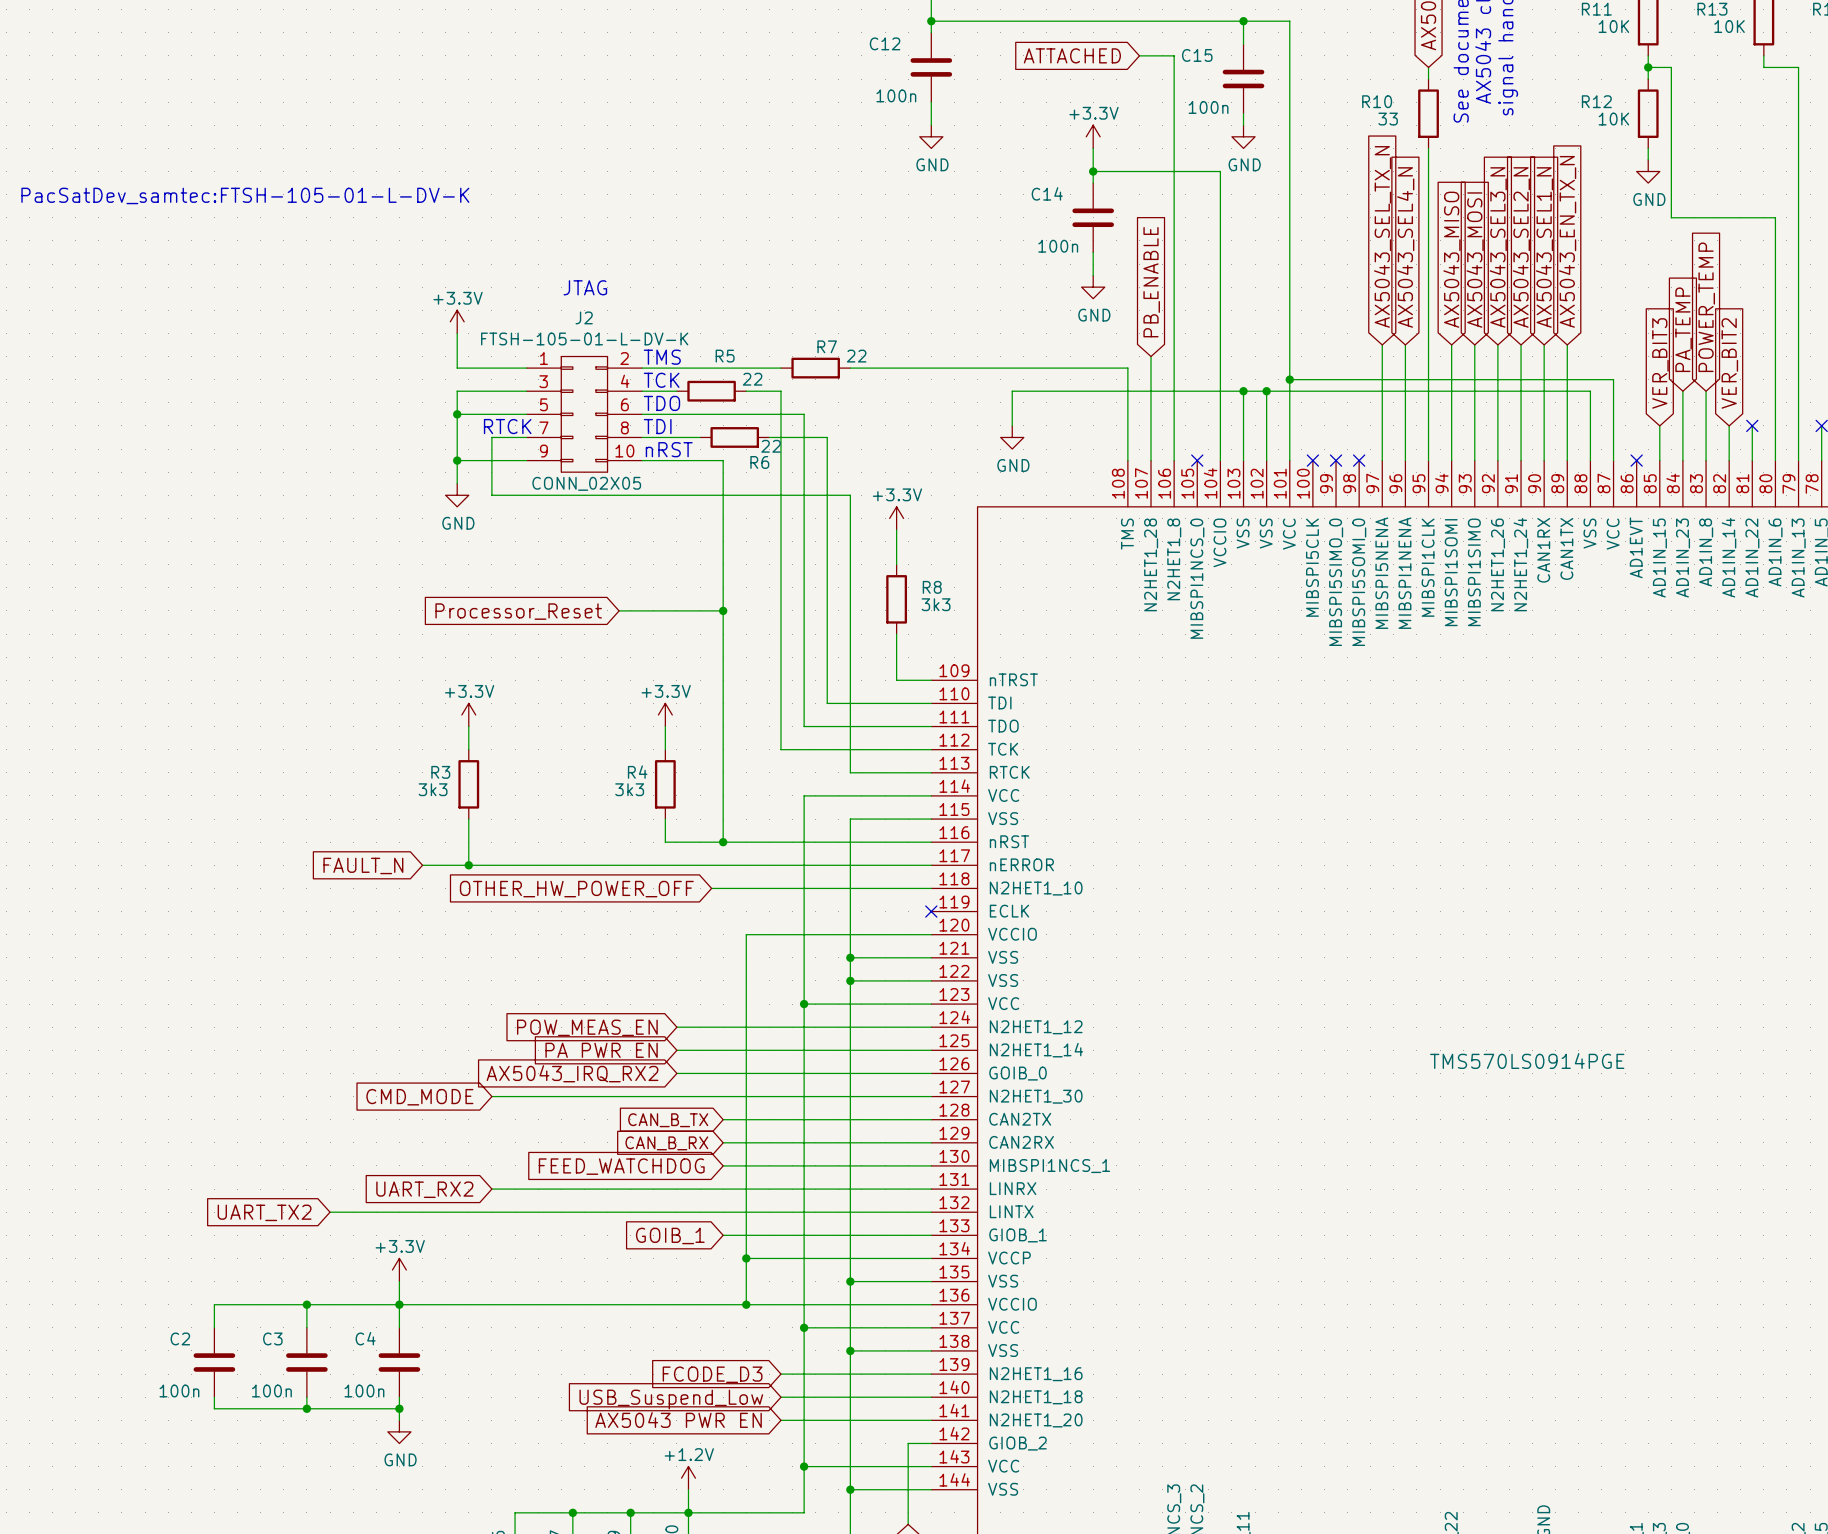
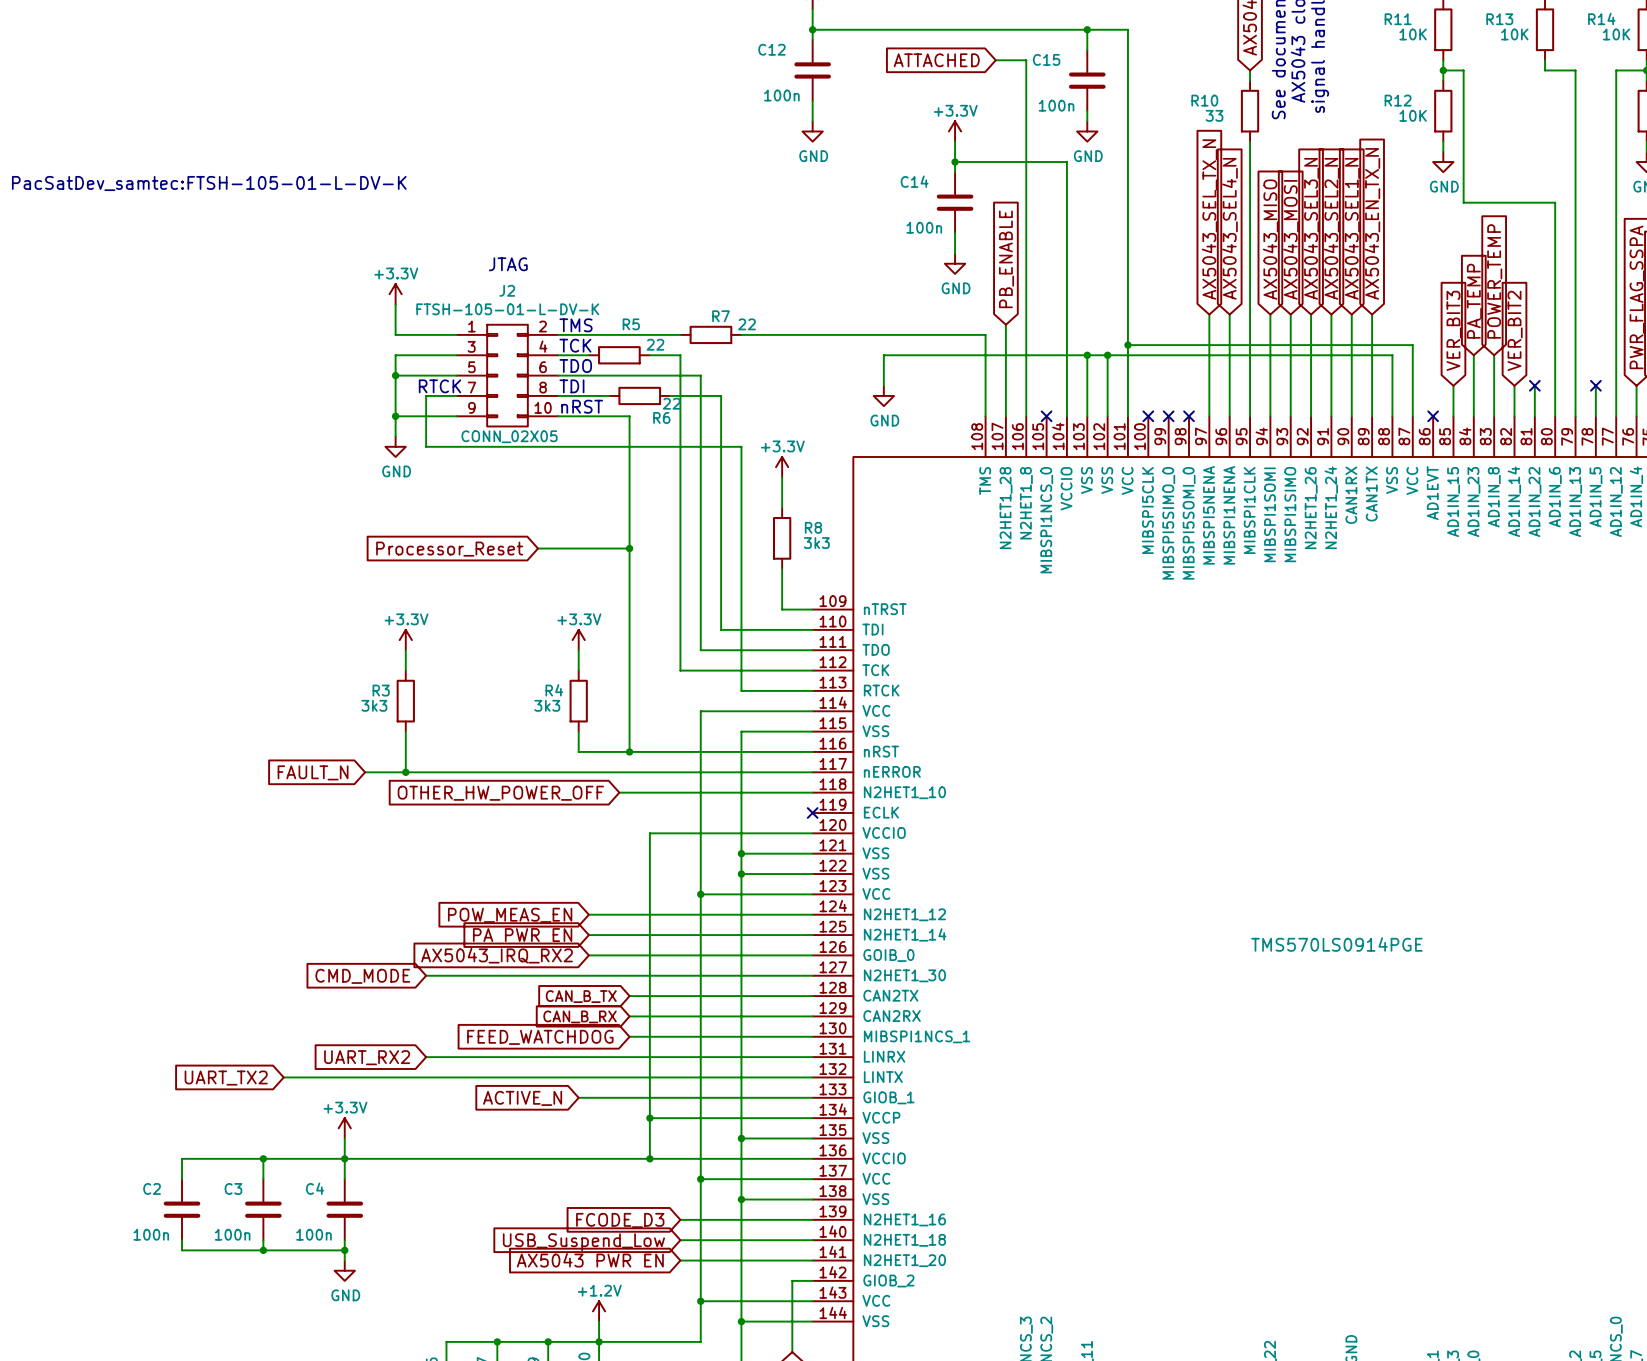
global label: none -> ACTIVE_N (522, 1098)
wire: none -> (578, 1097) (629, 1097)
global label: GOIB_1 (670, 1235) -> none

